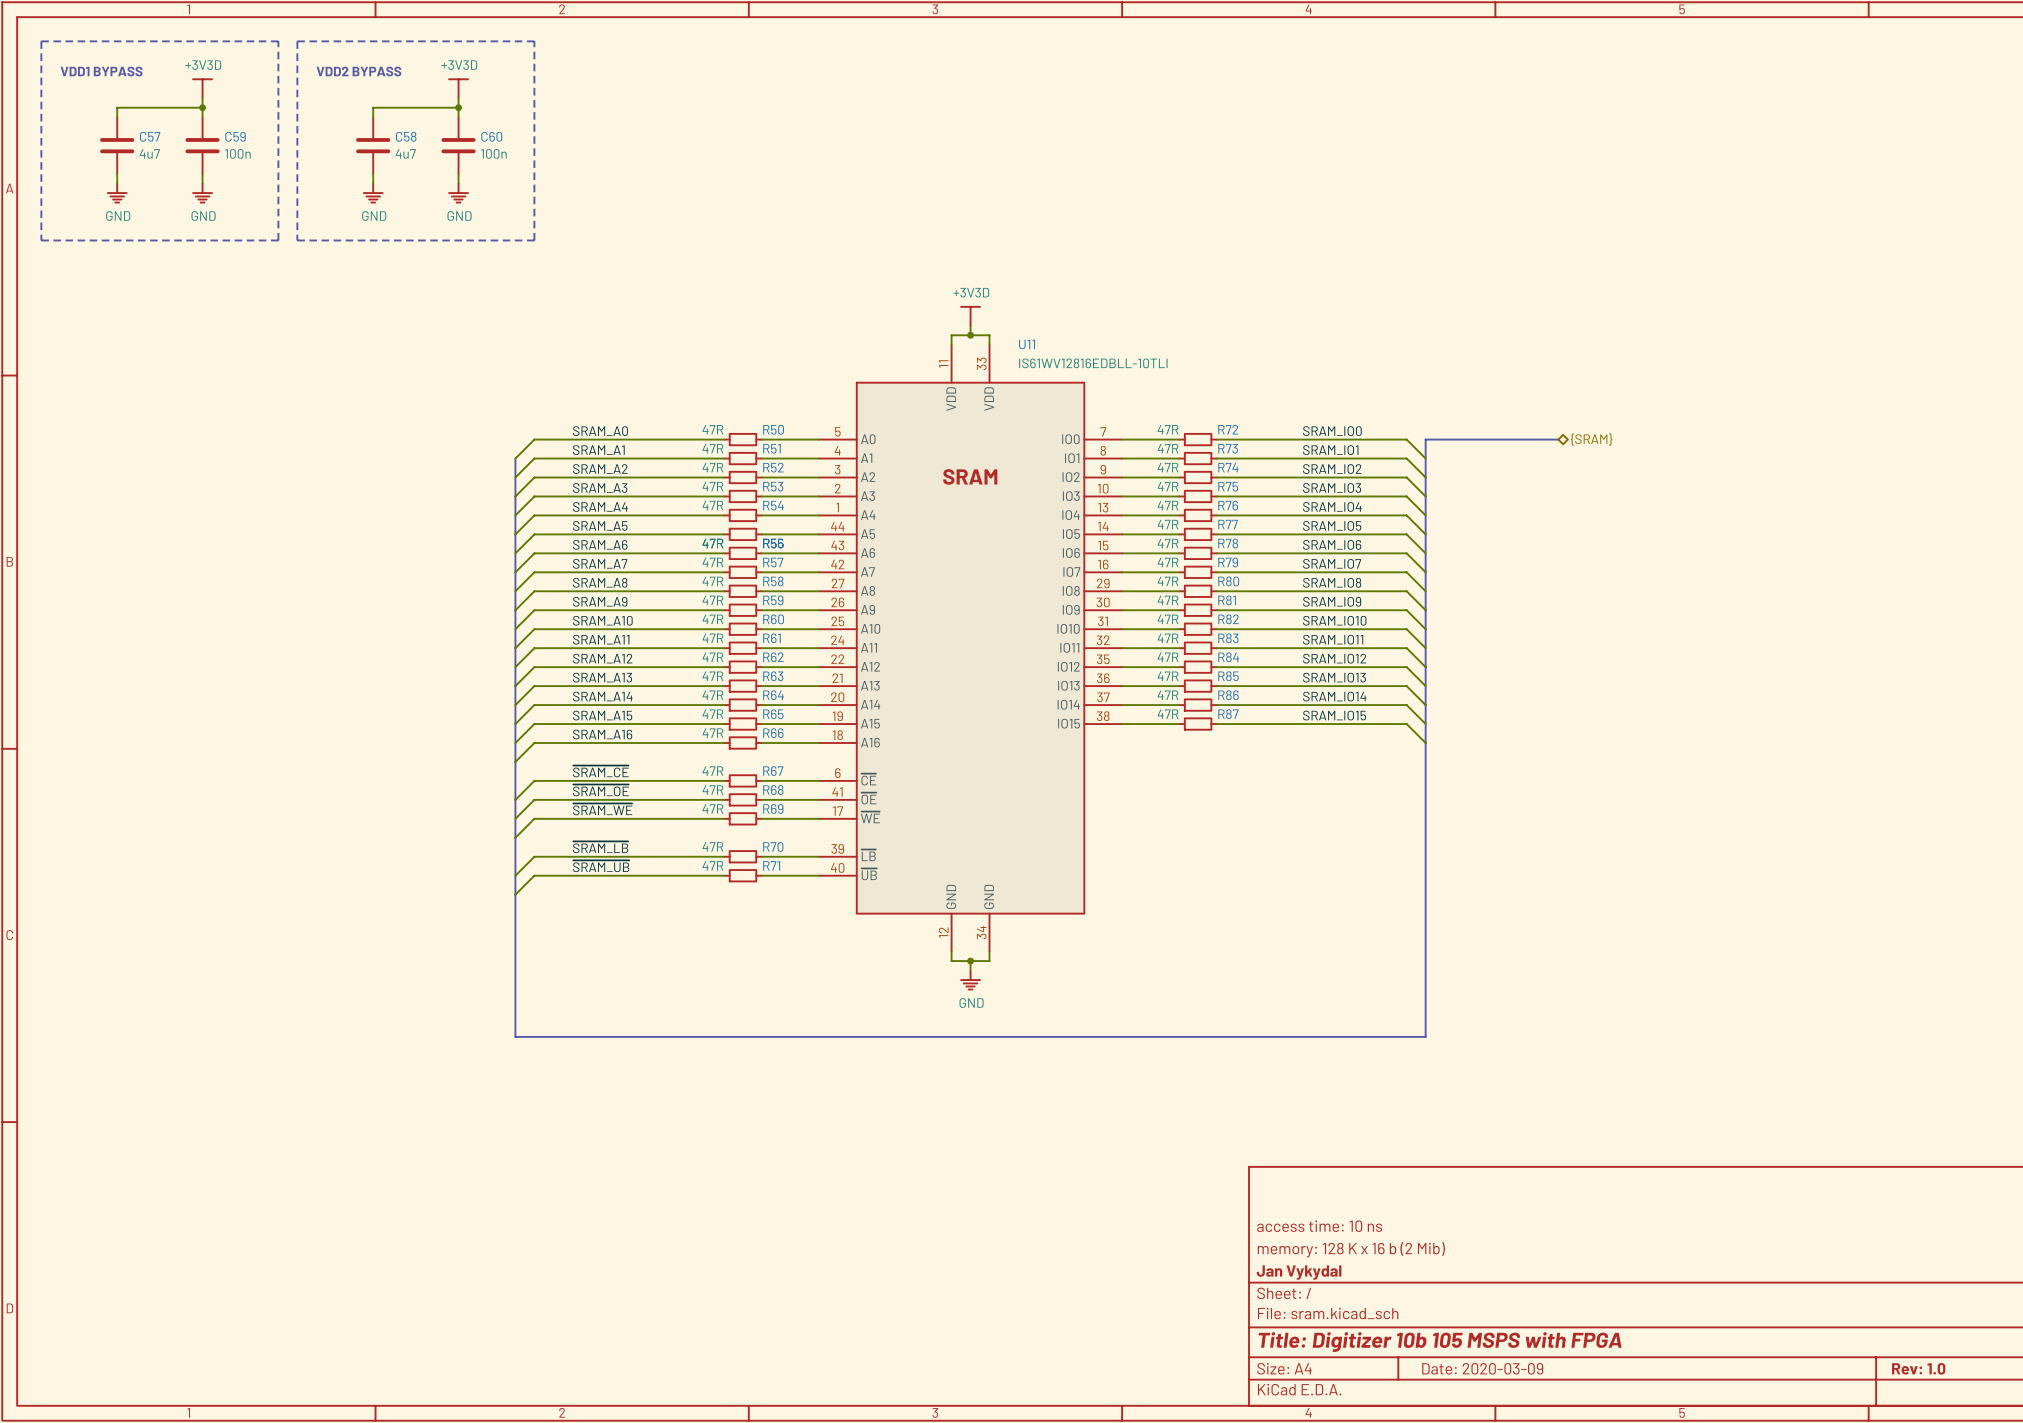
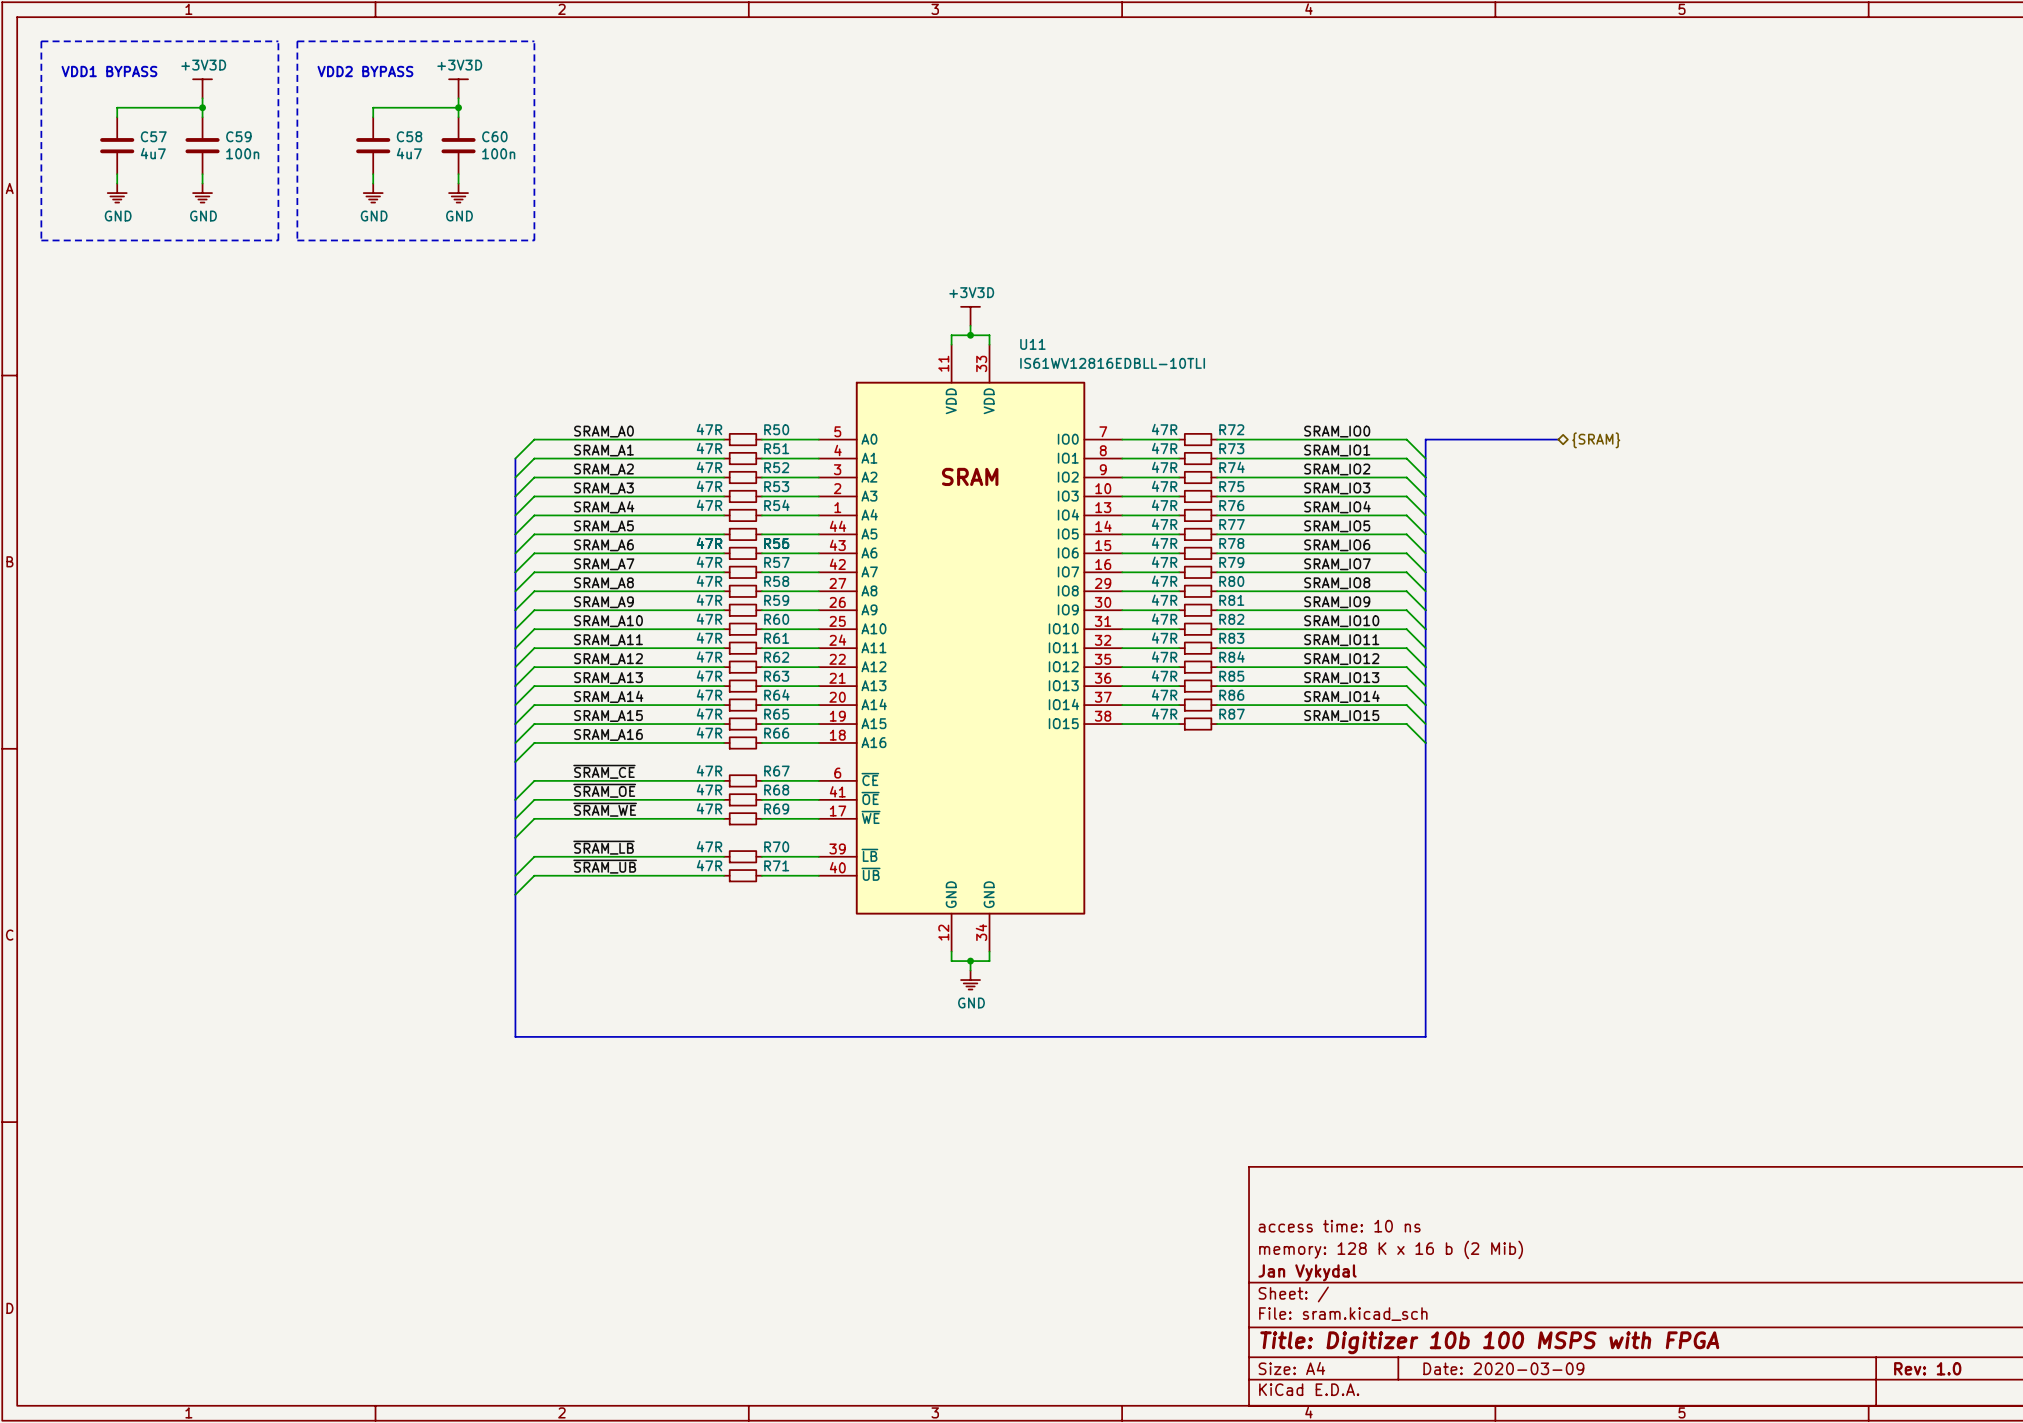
title block: Title: Digitizer 10b 105 MSPS with FPGA (1440, 1342) -> Title: Digitizer 10b 100 MSPS with FPGA (1489, 1342)

